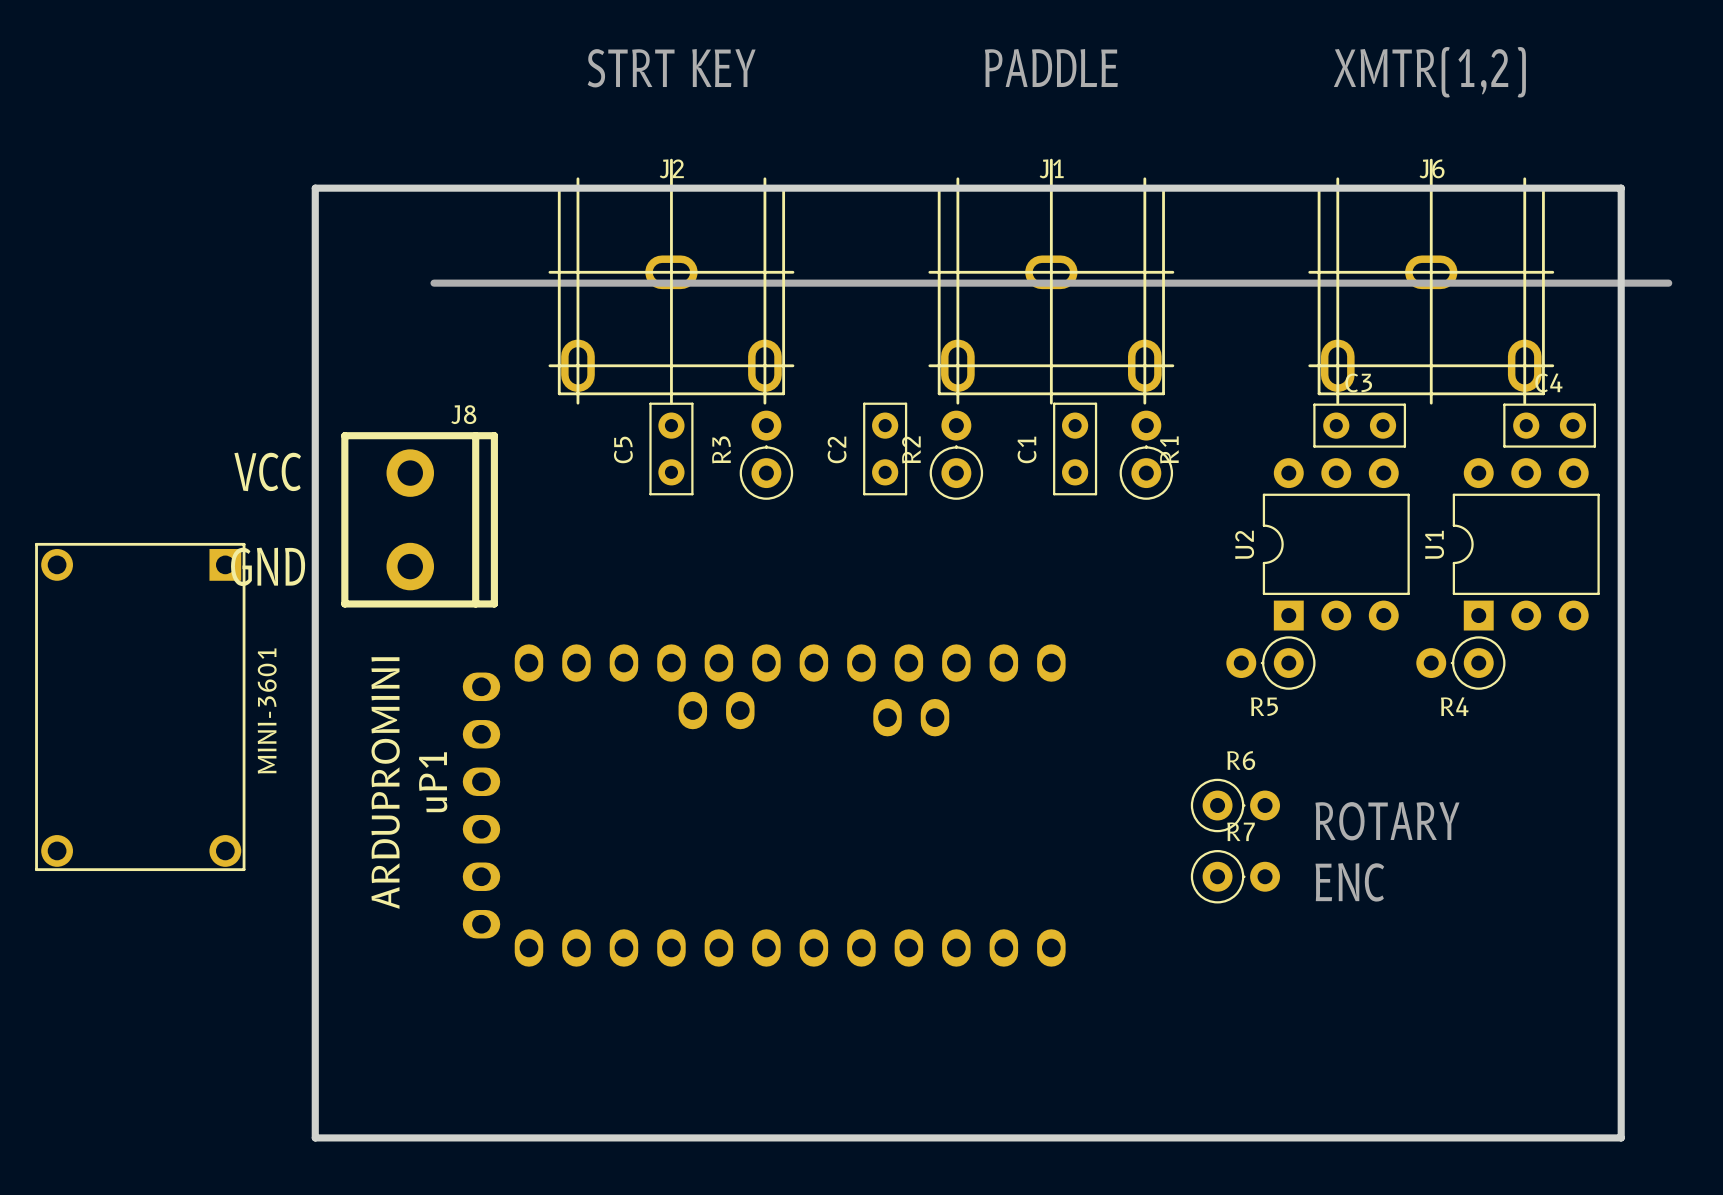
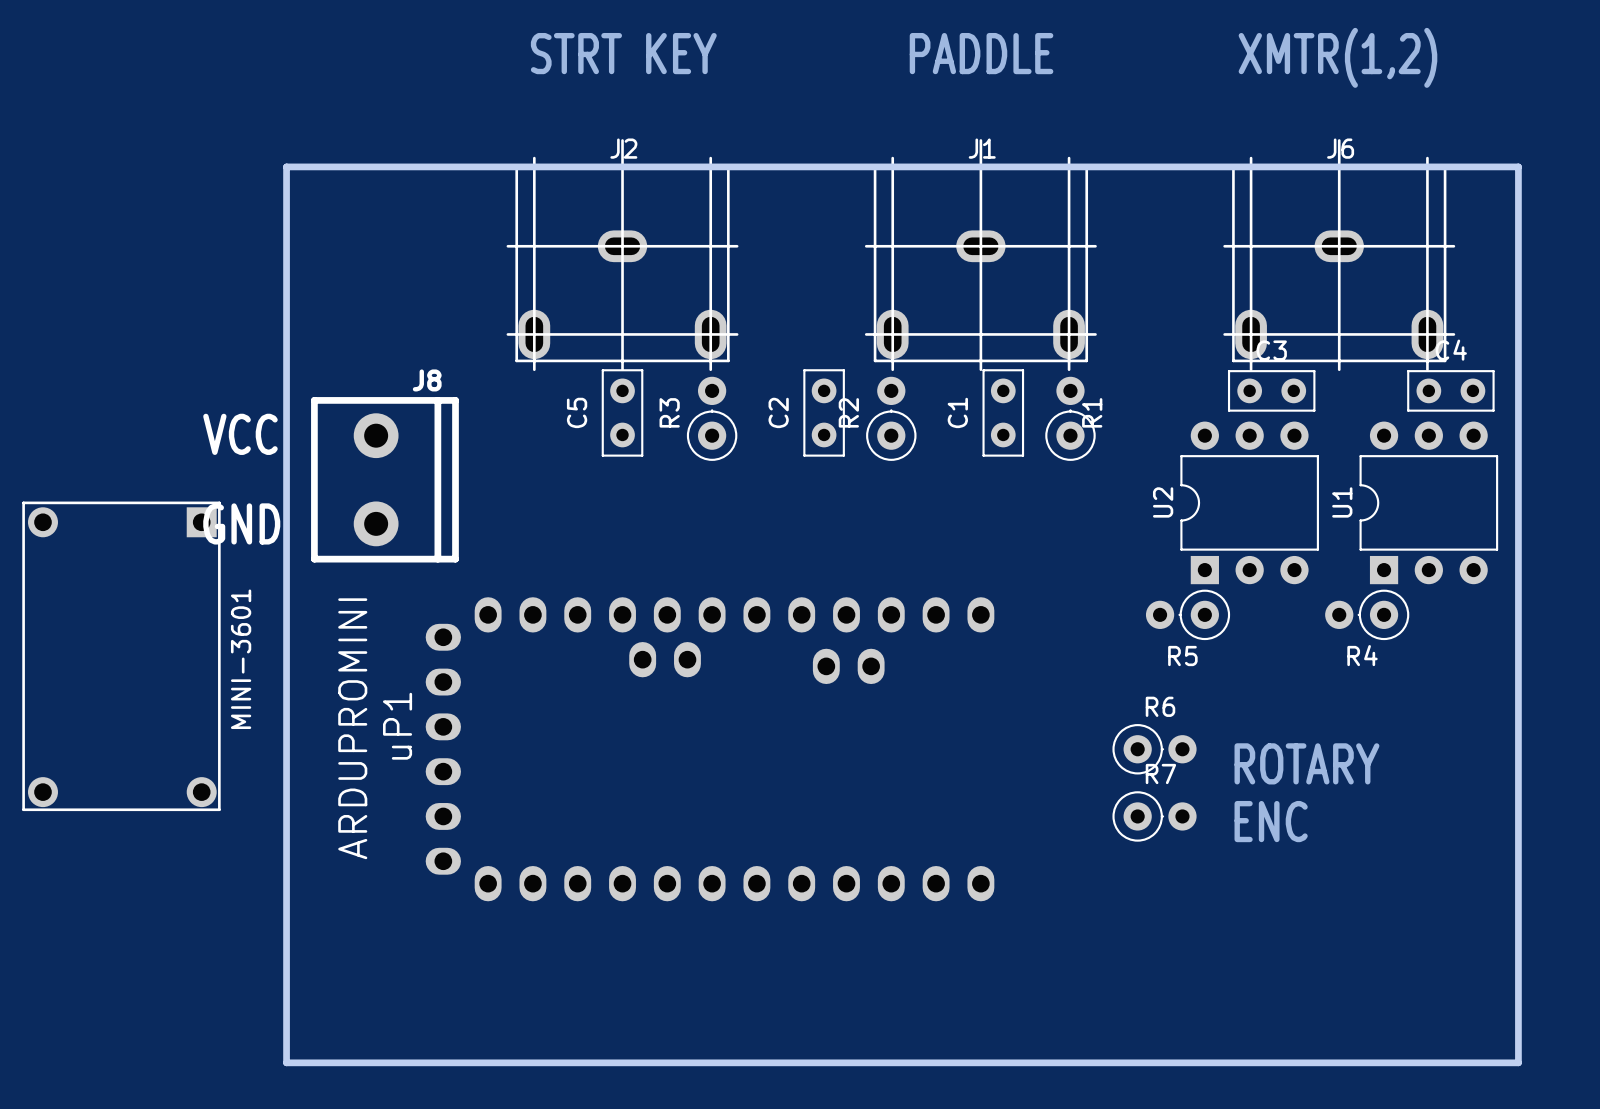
line: (434, 283) (1668, 283) -> none

